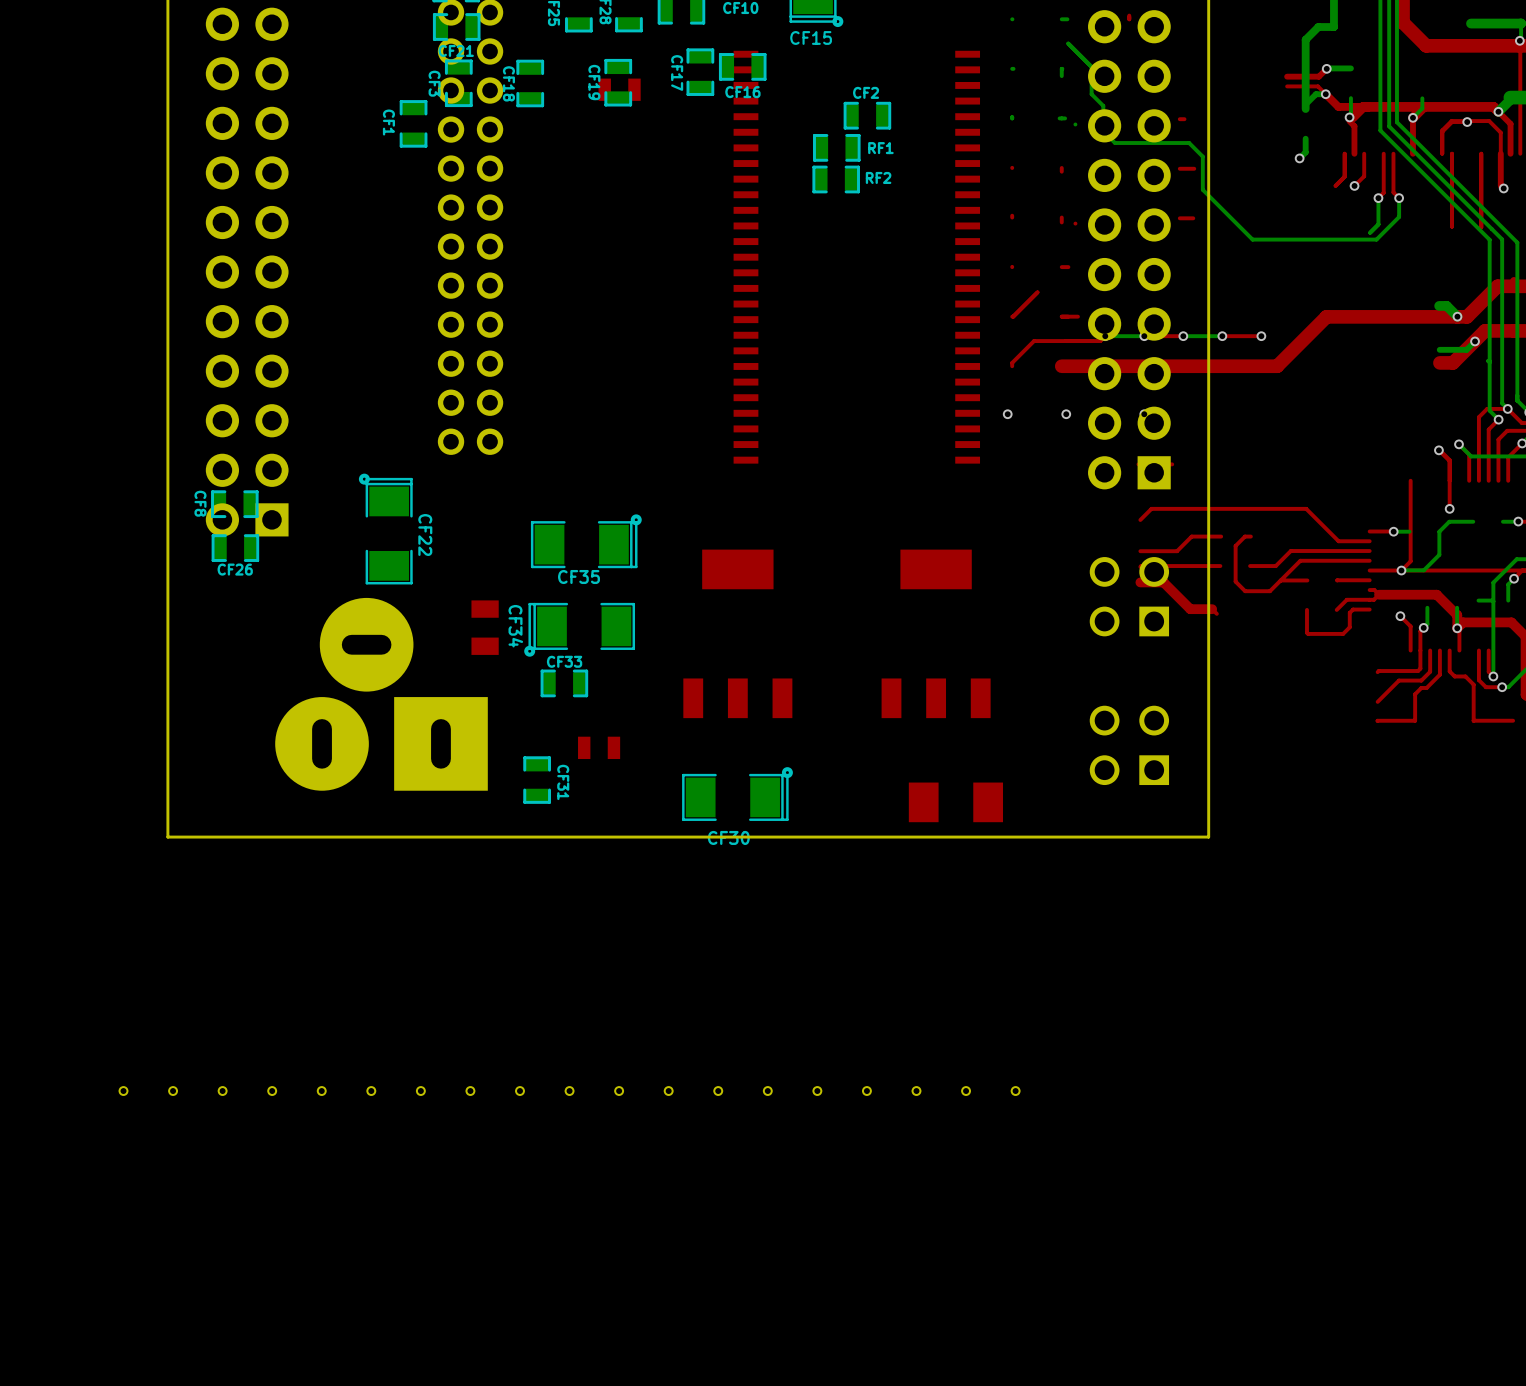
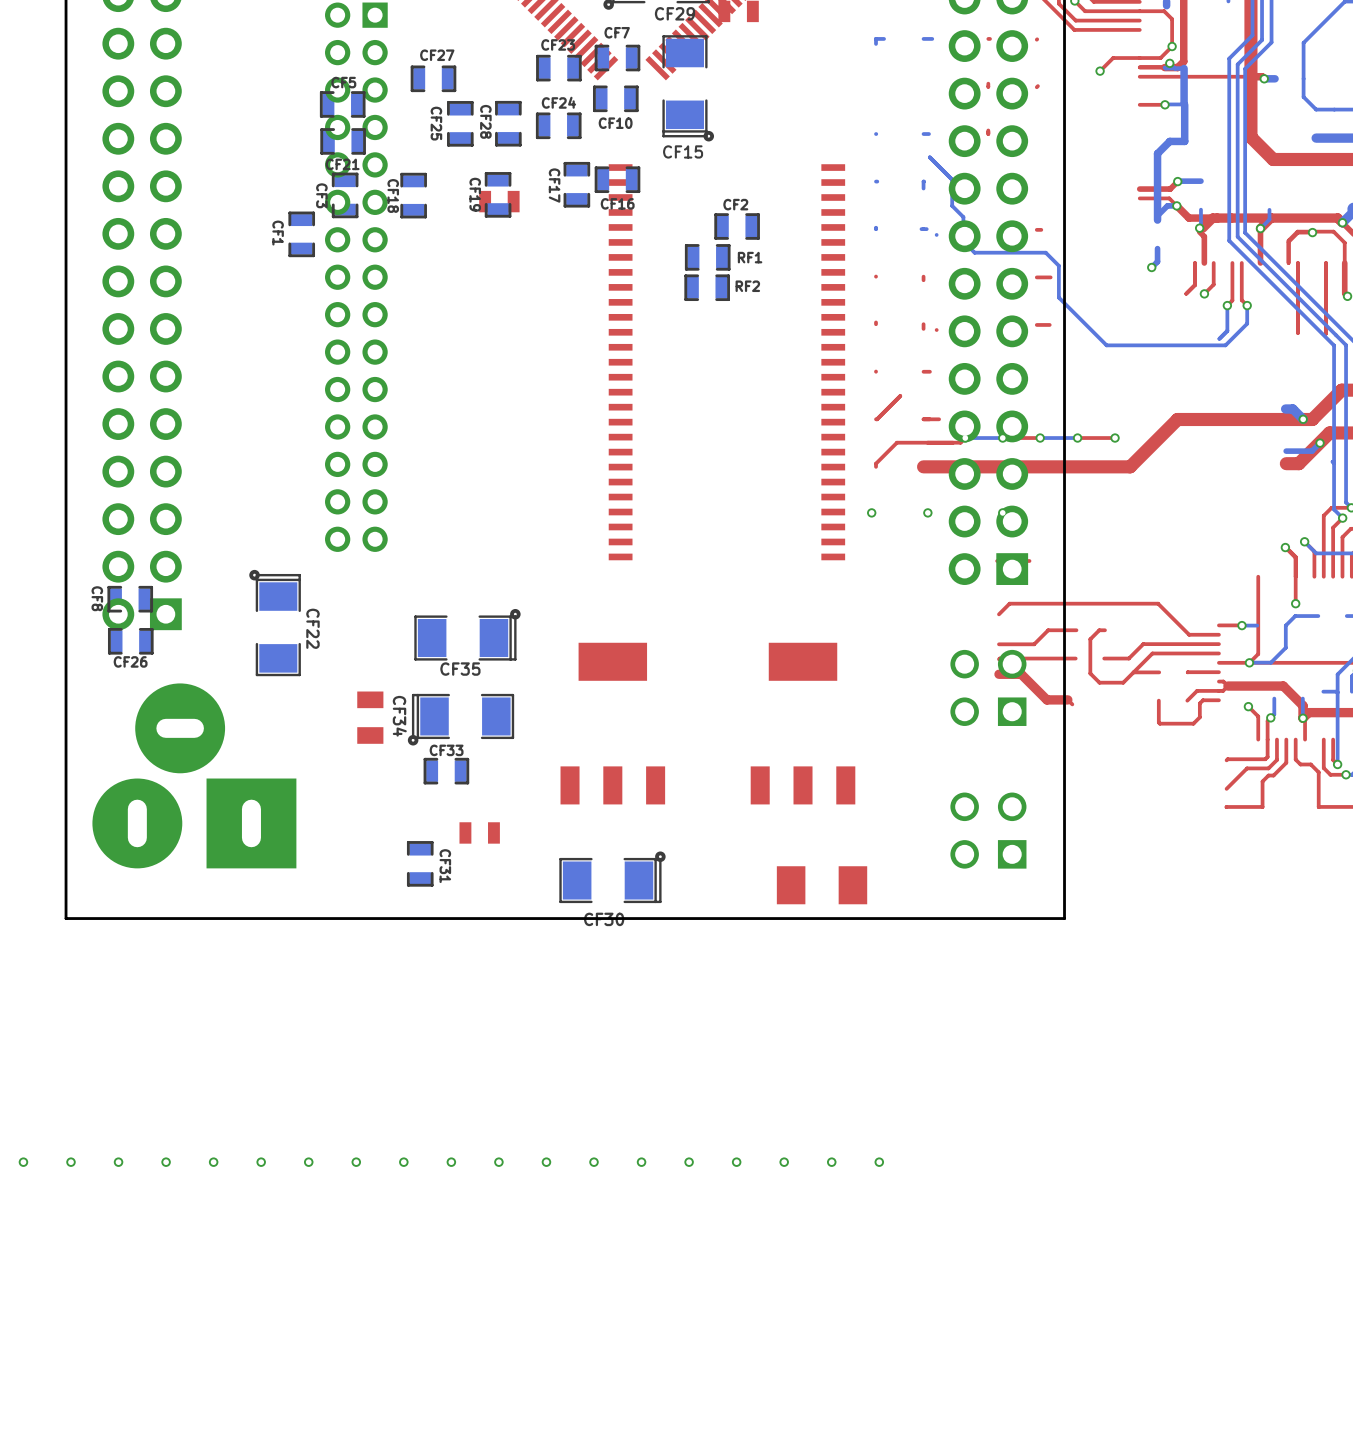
part position: (381, 694) -> (194, 775)

